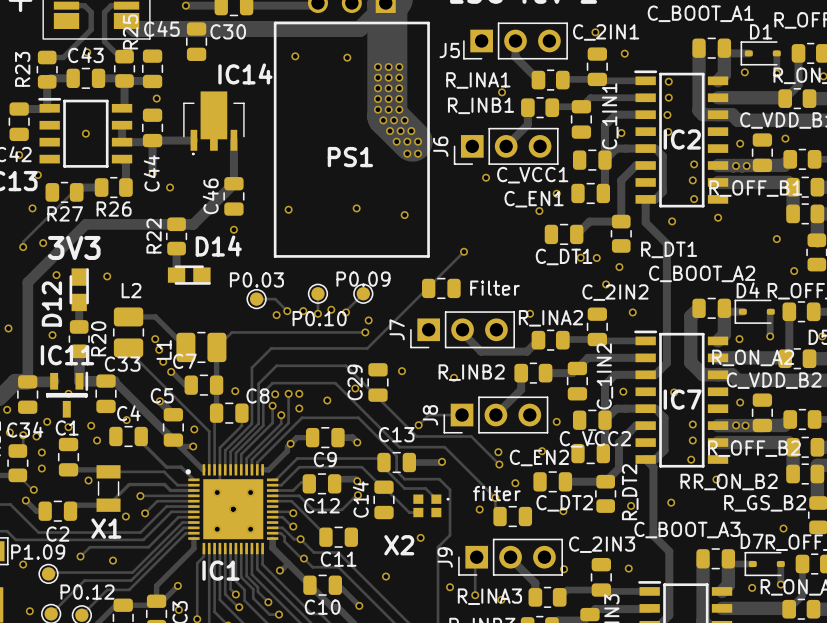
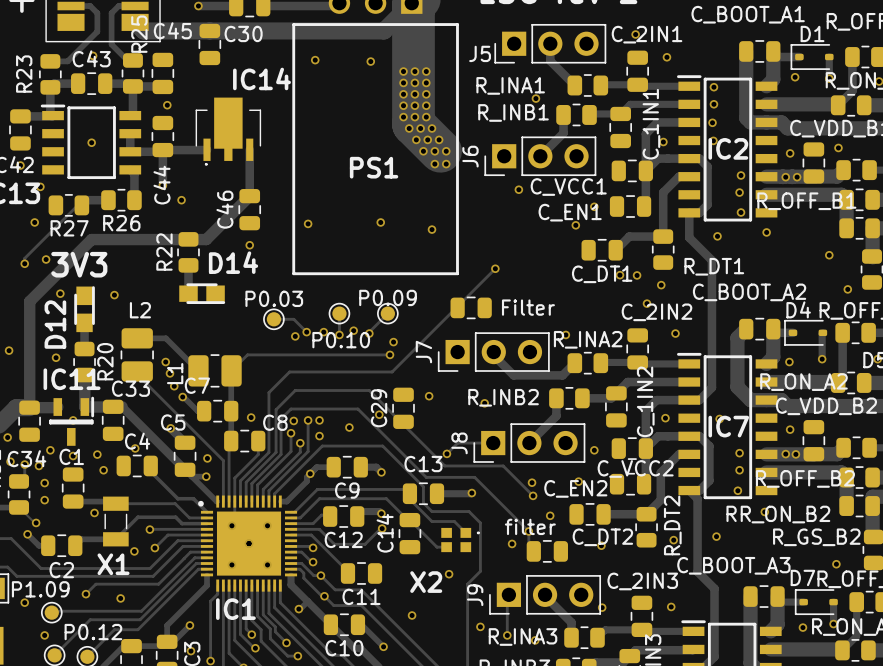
via: none -> (44, 635)
via: (29, 611) -> none

